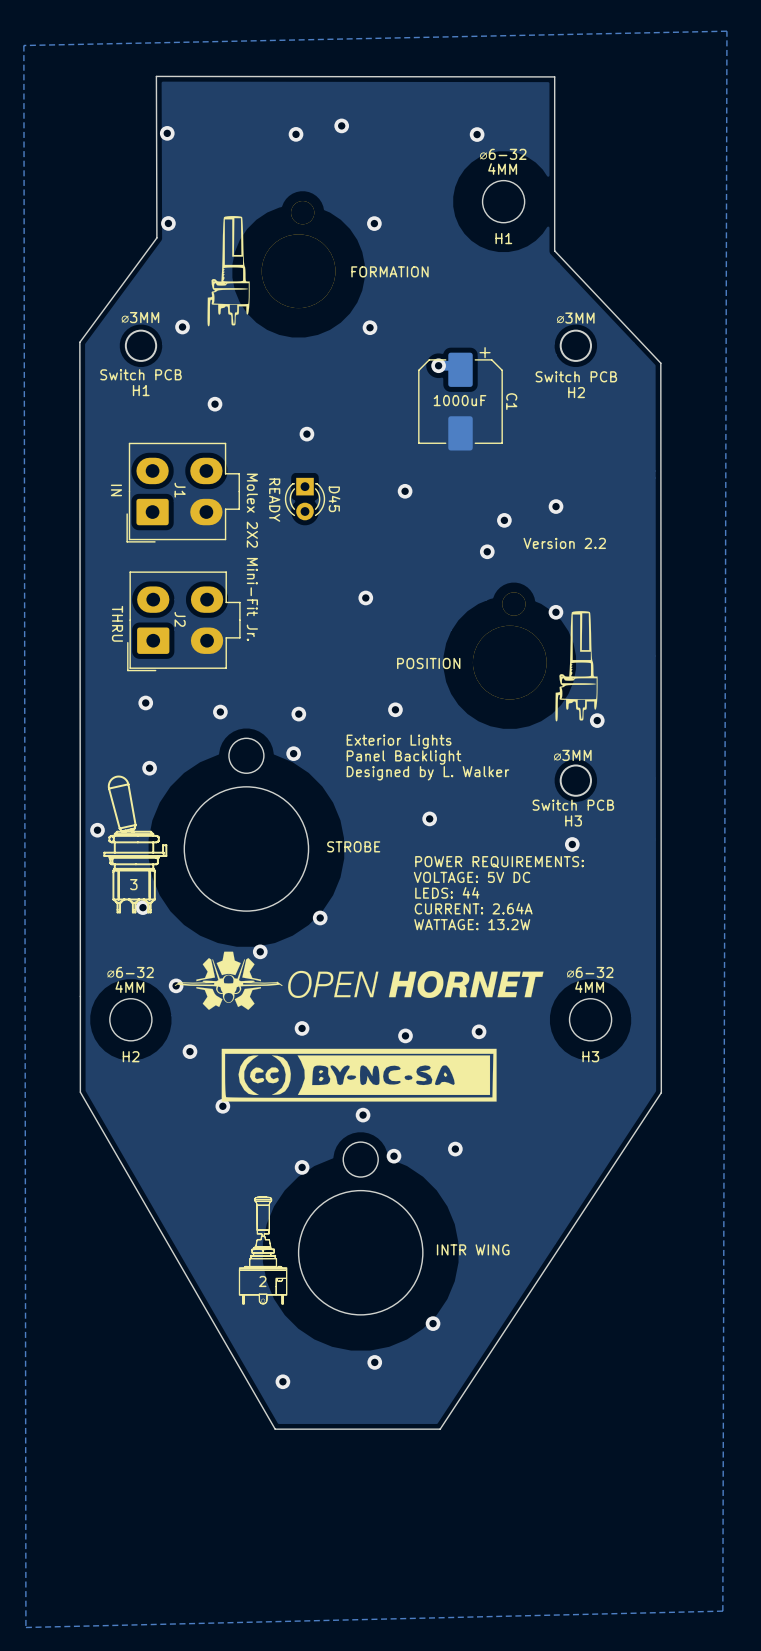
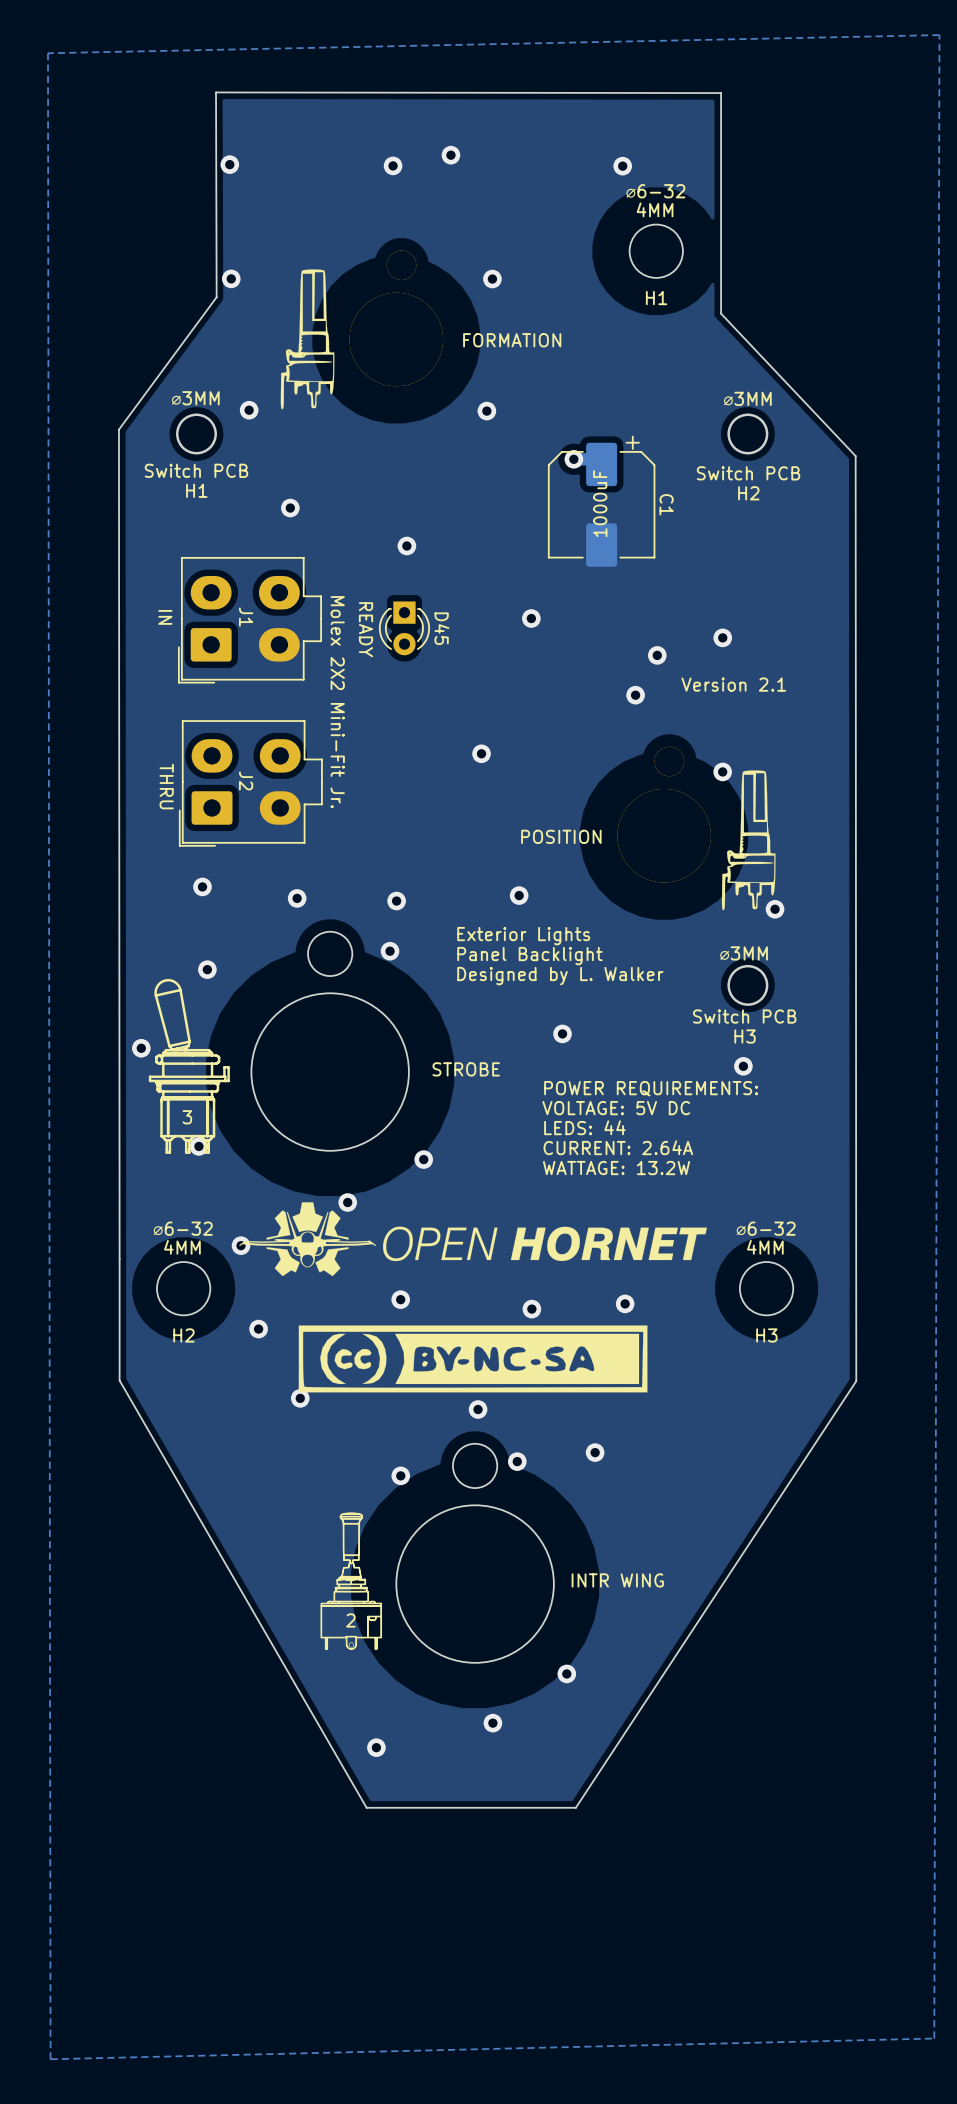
text rotation: 0° (460, 400) -> 90° counterclockwise (600, 503)
text: Version 2.2 (564, 543) -> Version 2.1 (733, 684)

